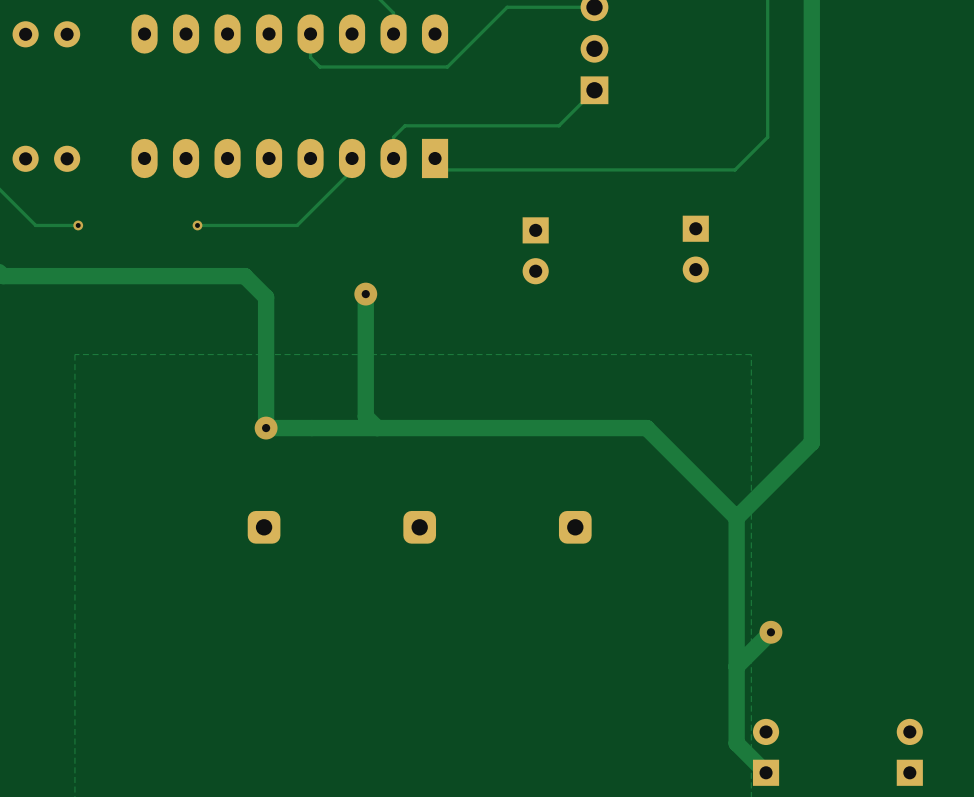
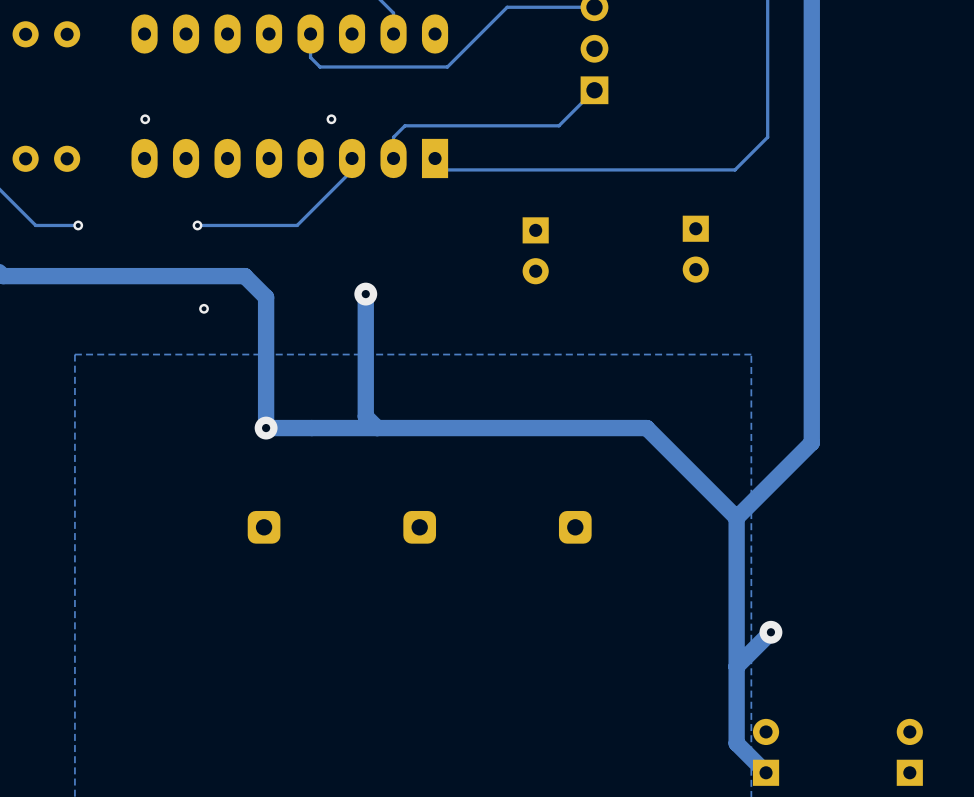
via: none -> (145, 119)
via: none -> (331, 119)
via: none -> (204, 308)

